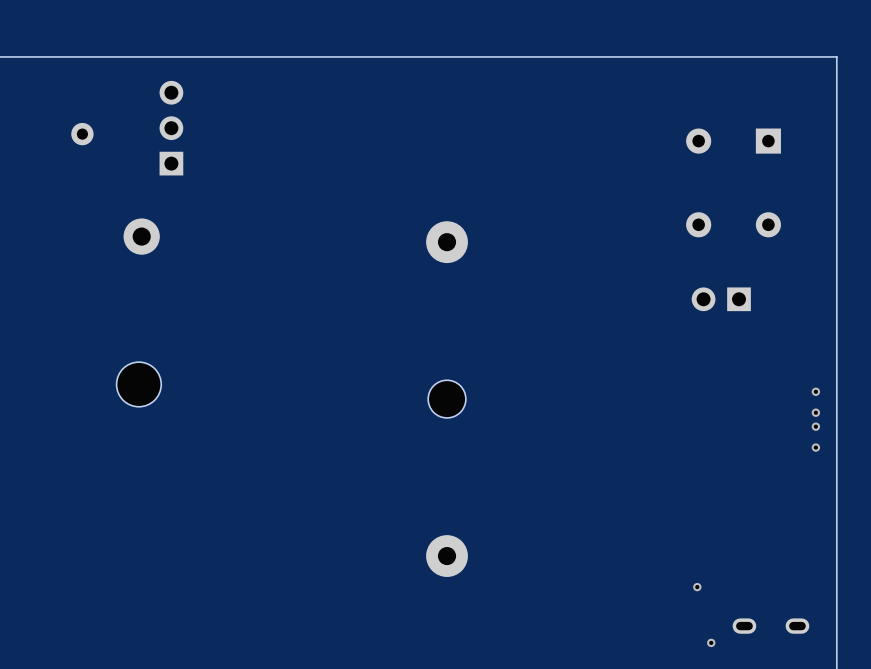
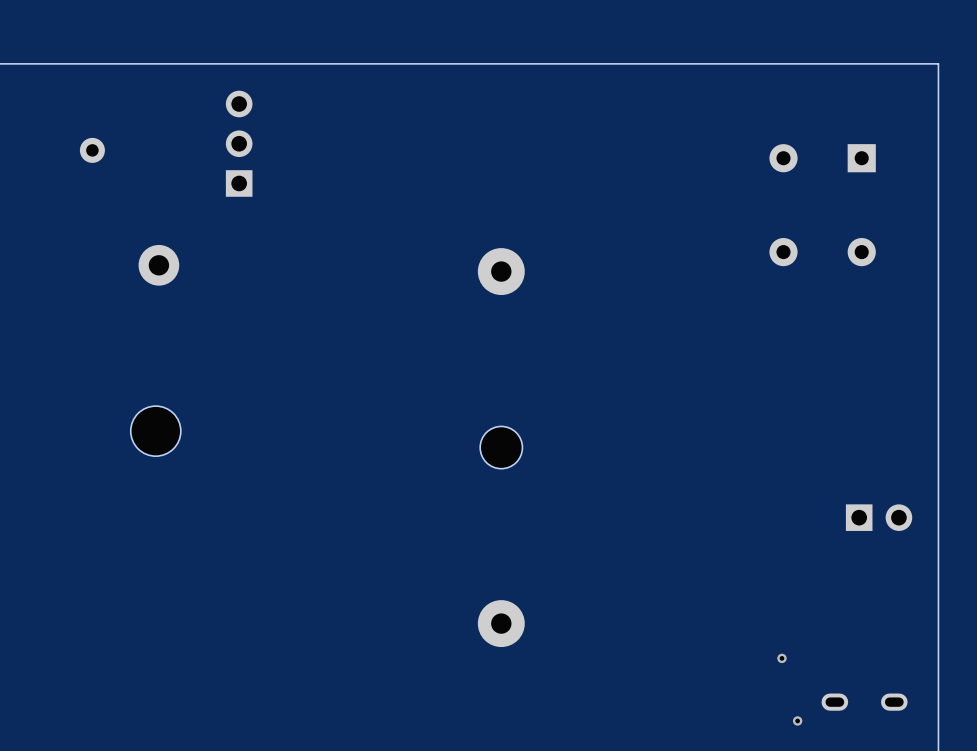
part position: (171, 128) -> (239, 143)
part rotation: 0° (721, 299) -> 180° (879, 517)
part position: (721, 299) -> (879, 517)
via: (815, 391) -> none
via: (815, 412) -> none
via: (815, 426) -> none
via: (815, 447) -> none

